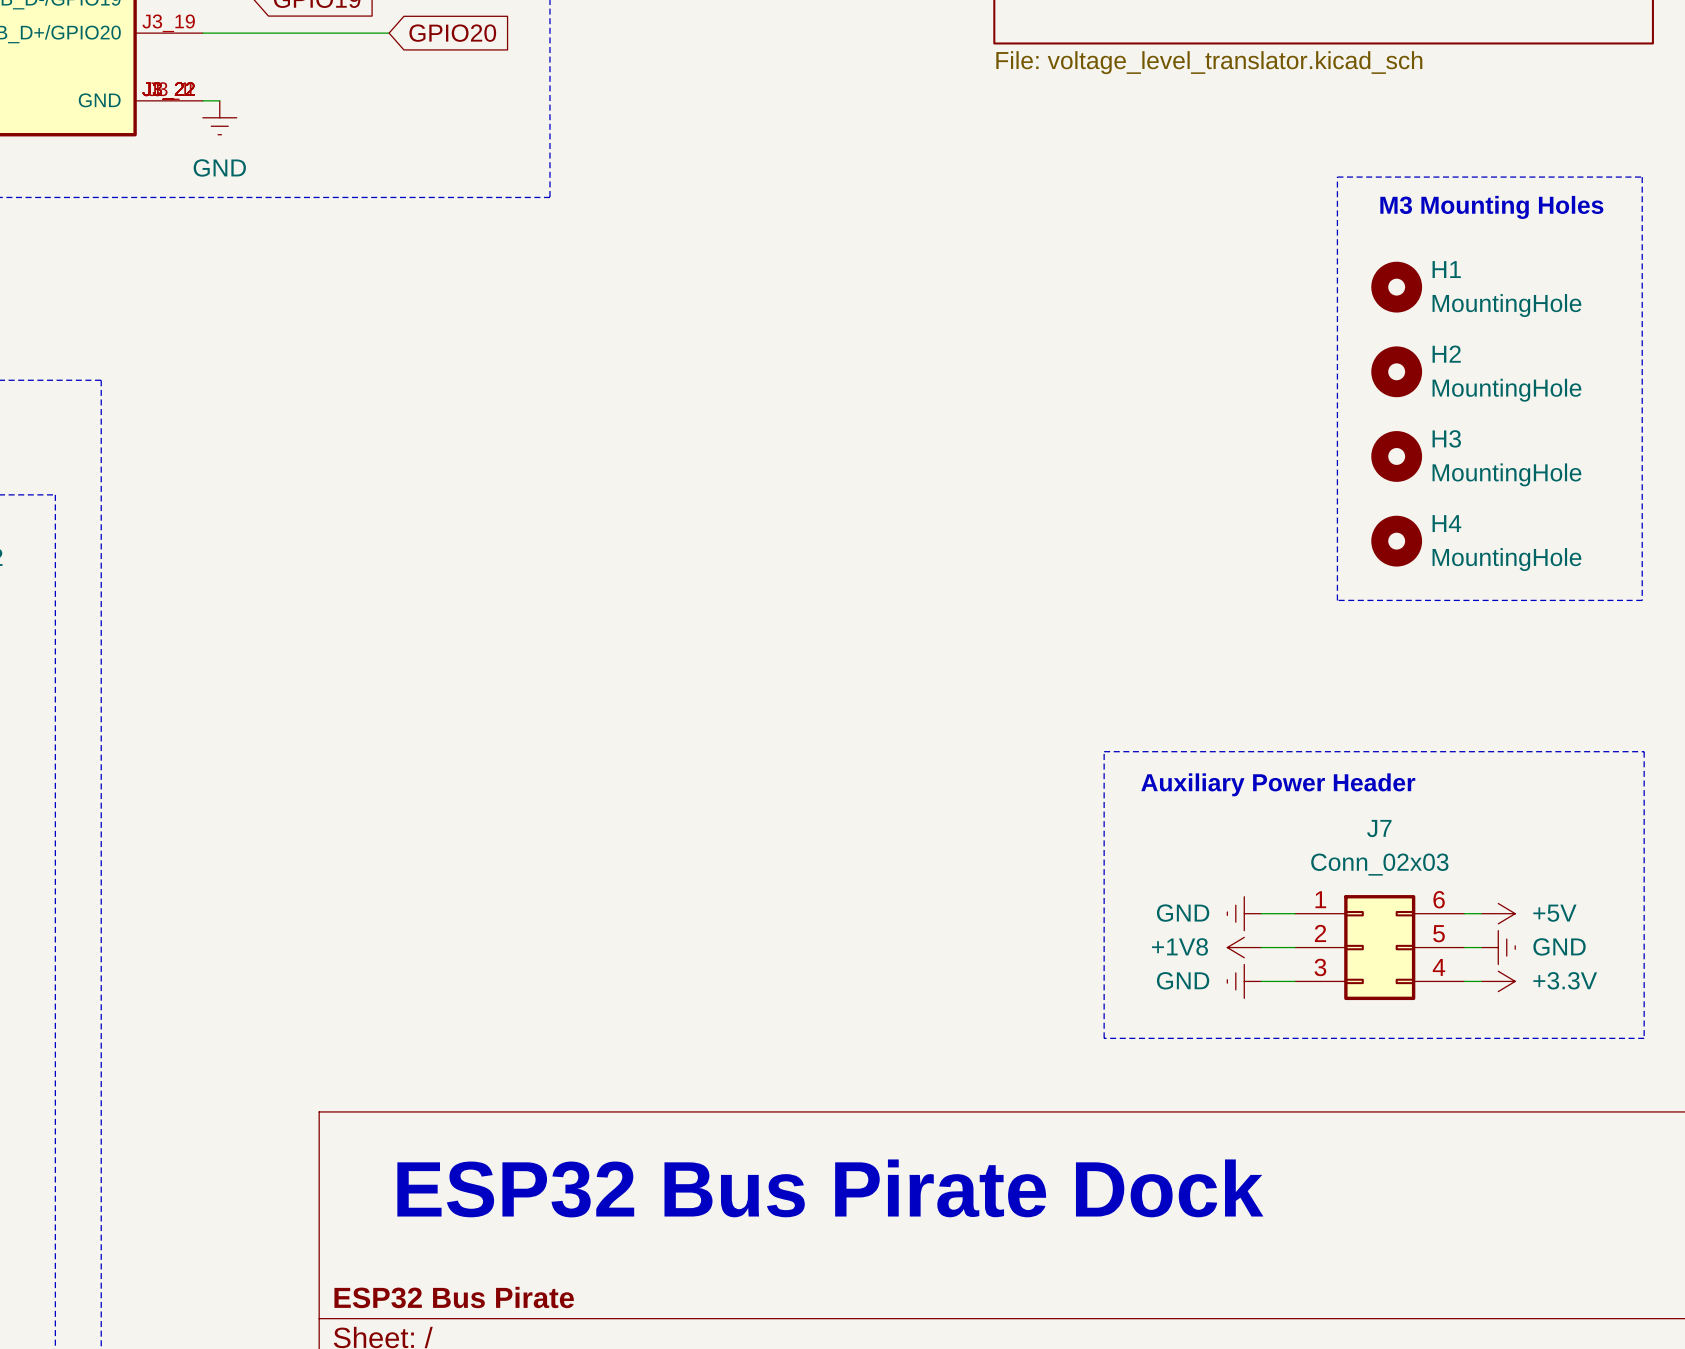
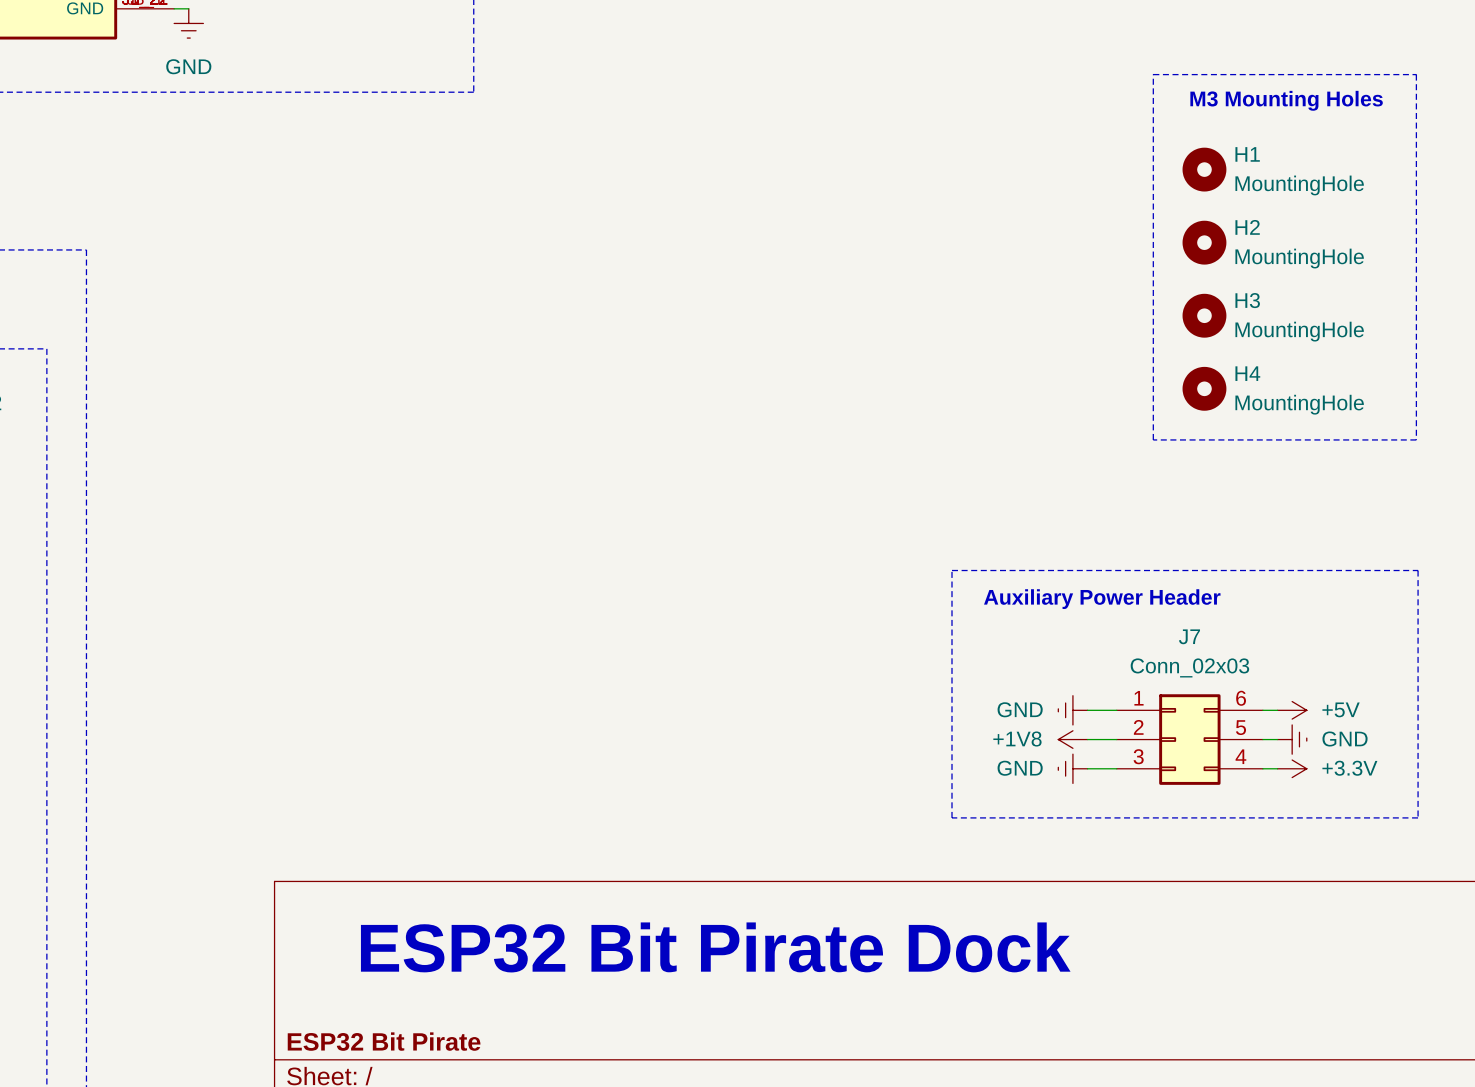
text: ESP32 Bus Pirate Dock (830, 1188) -> ESP32 Bit Pirate Dock (715, 947)
title block: ESP32 Bus Pirate (454, 1297) -> ESP32 Bit Pirate (384, 1041)

